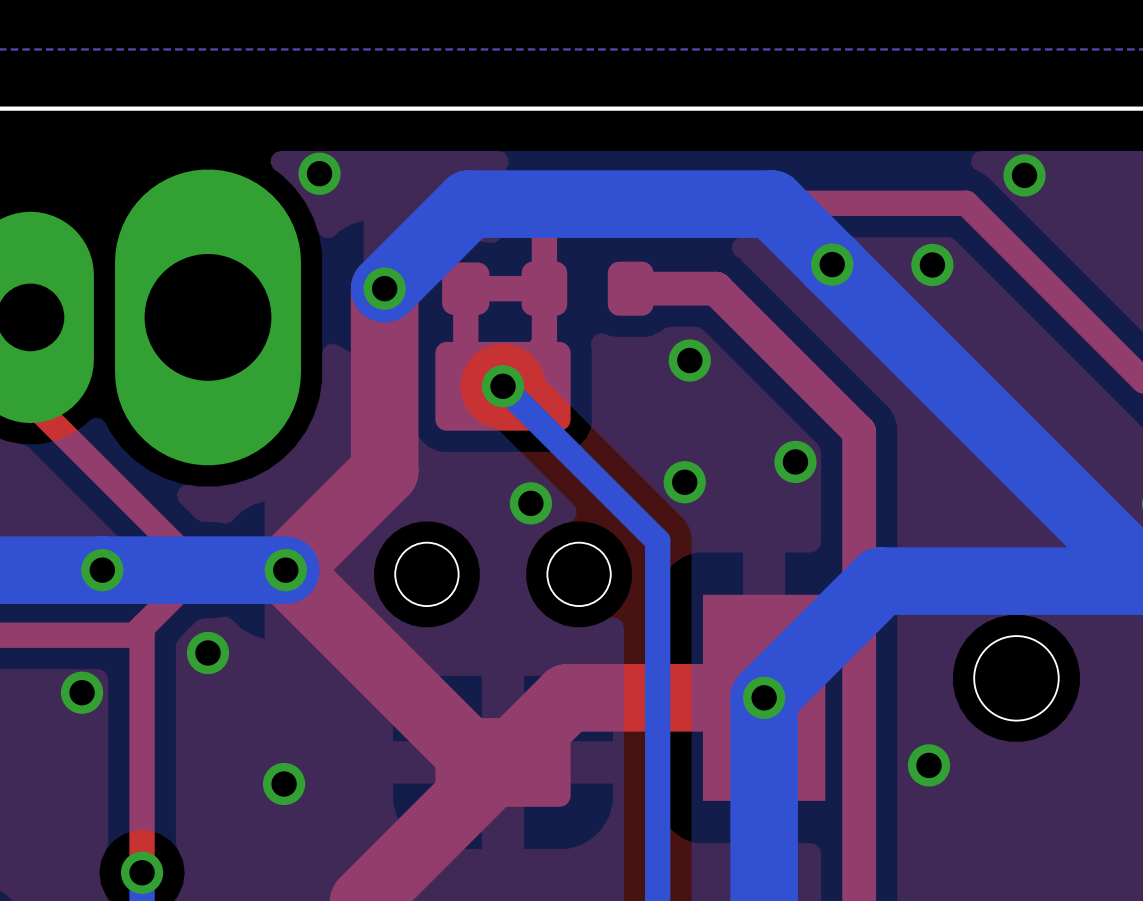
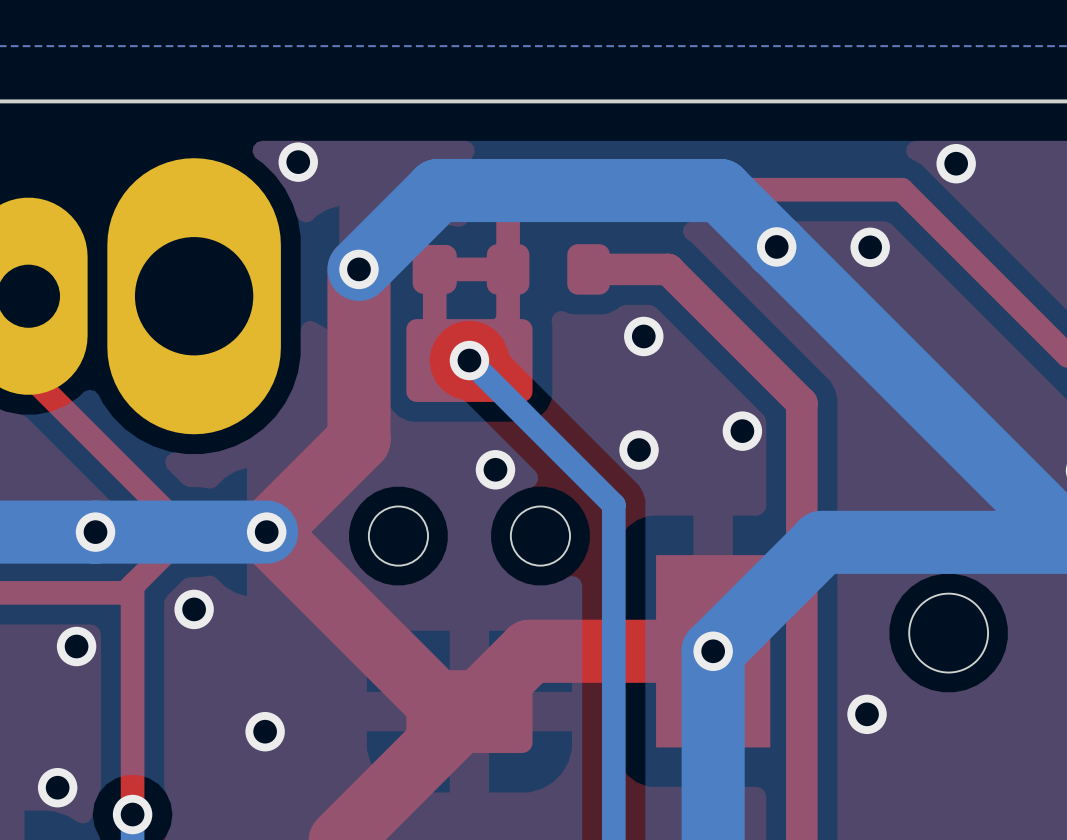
via: none -> (57, 787)

